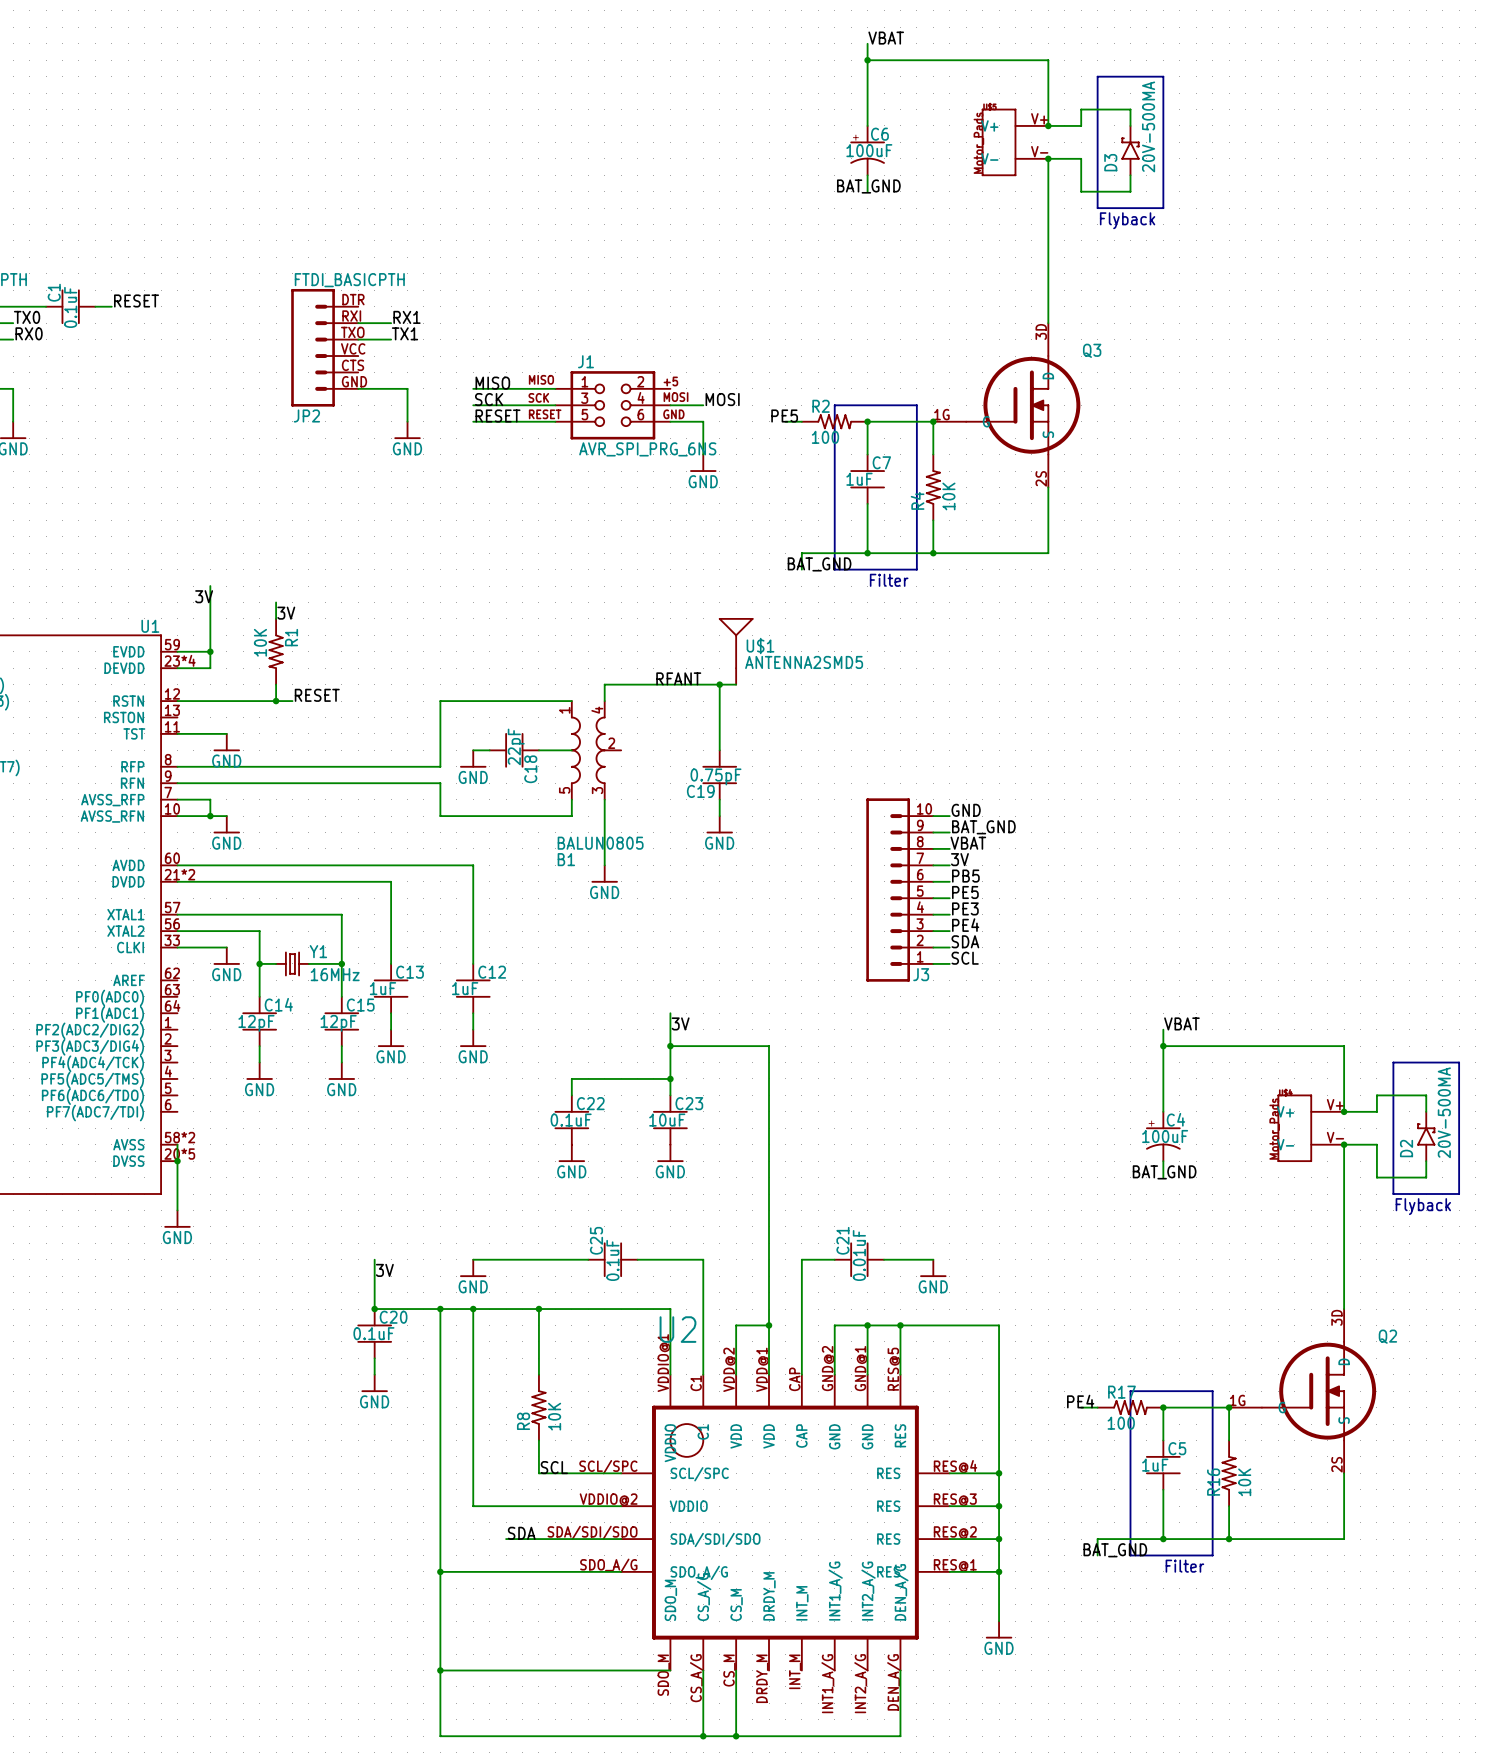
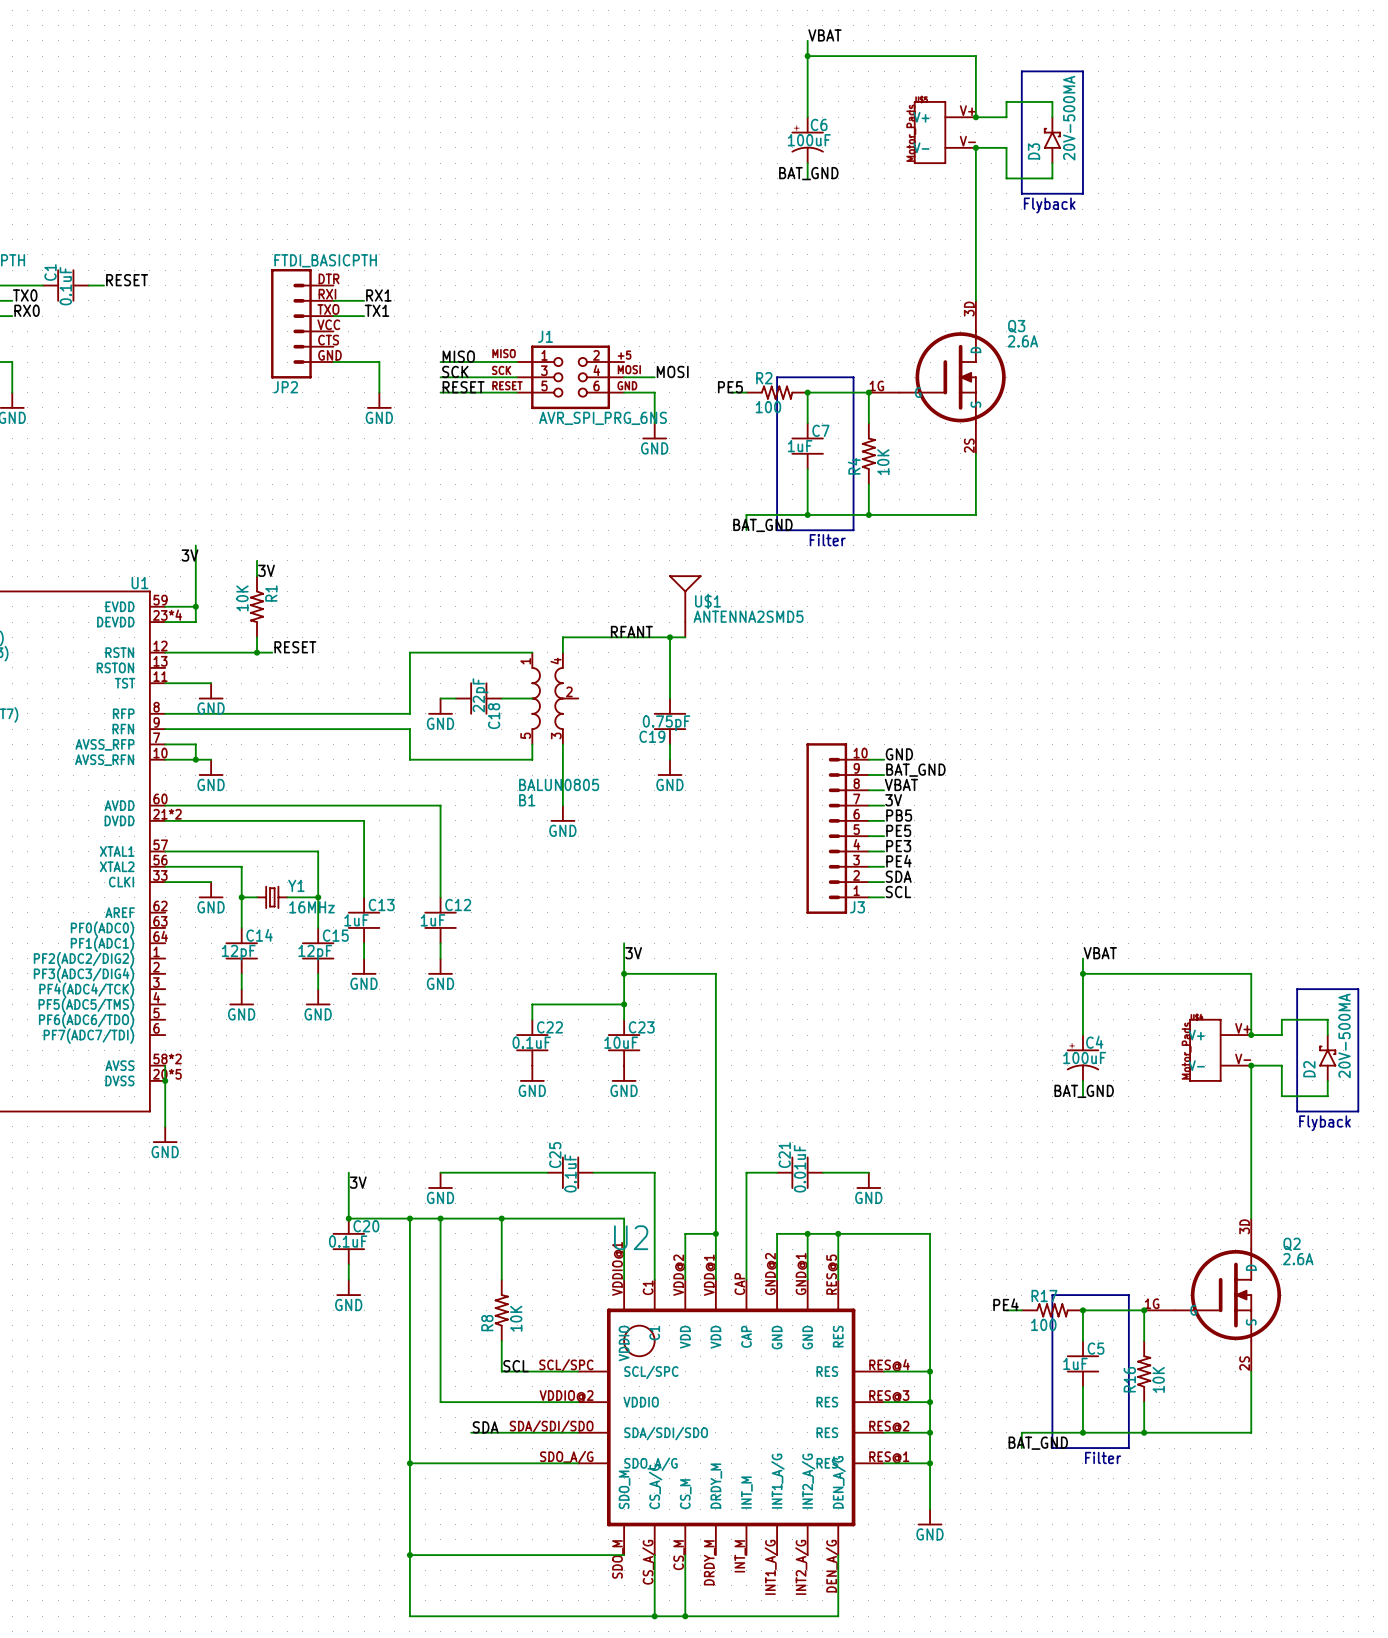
Q3 value: none -> 2.6A (1022, 341)
Q2 value: none -> 2.6A (1298, 1259)

